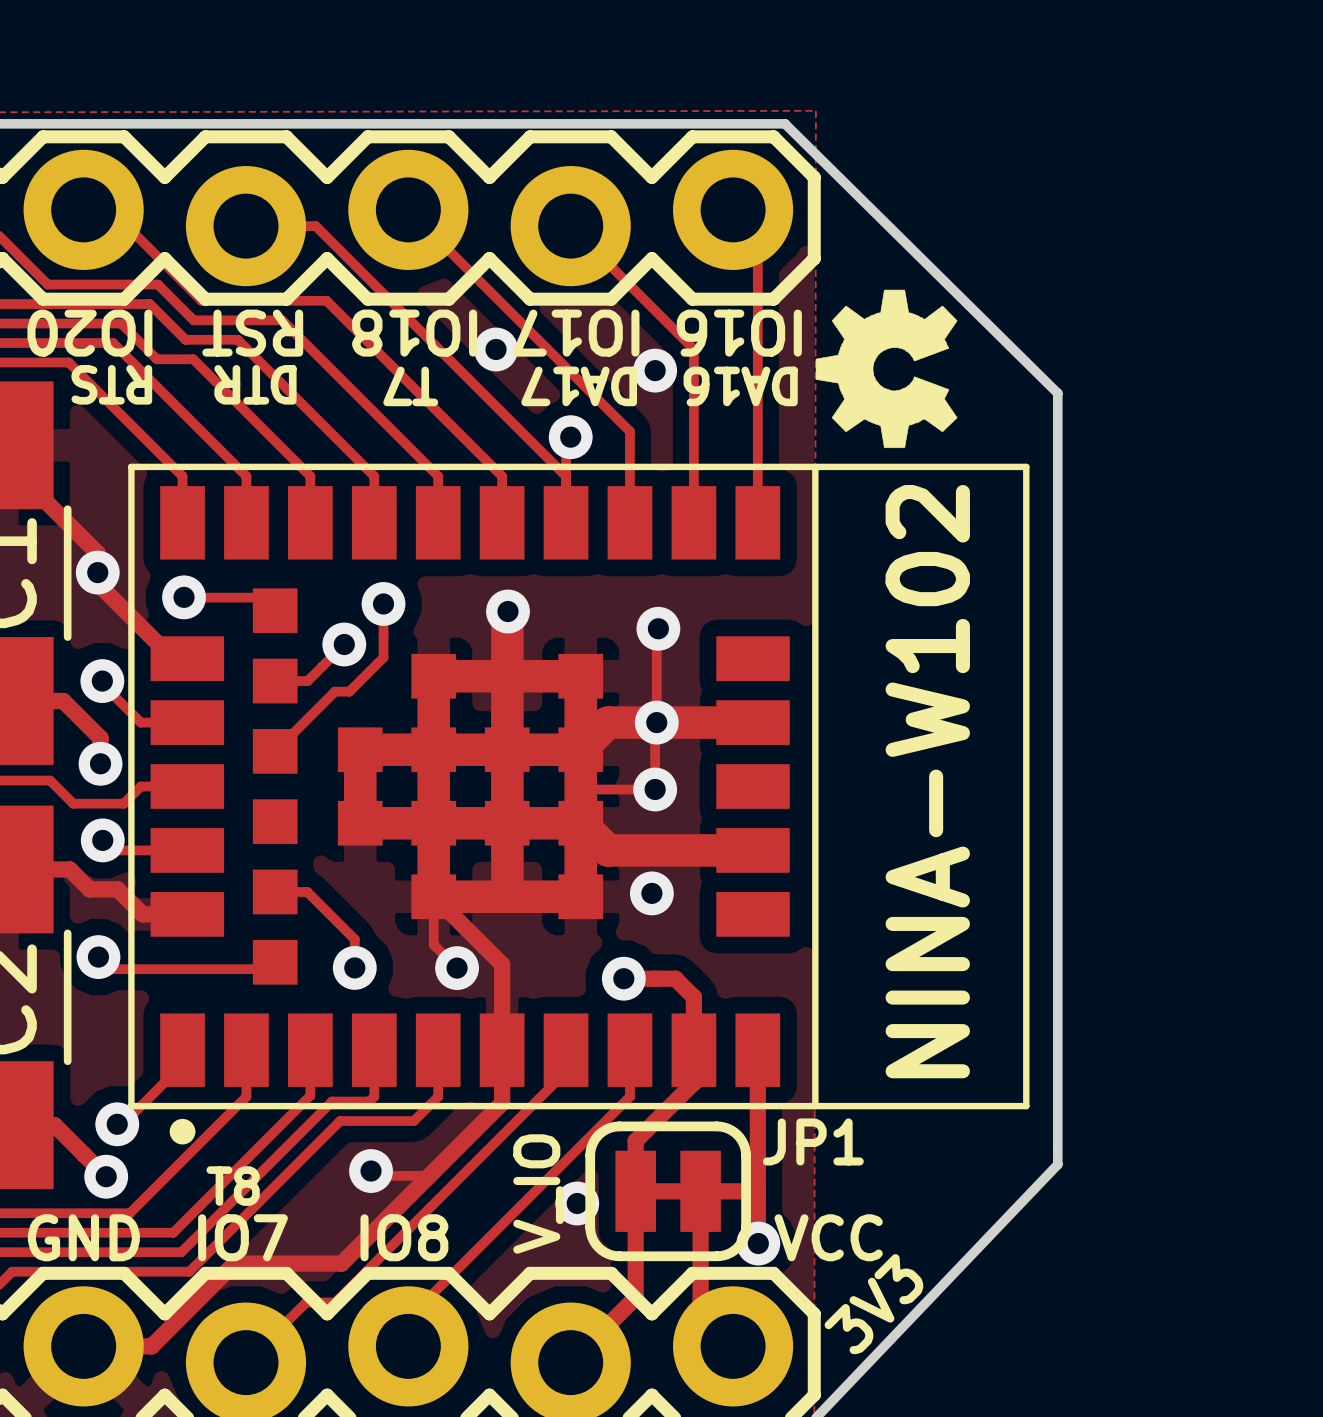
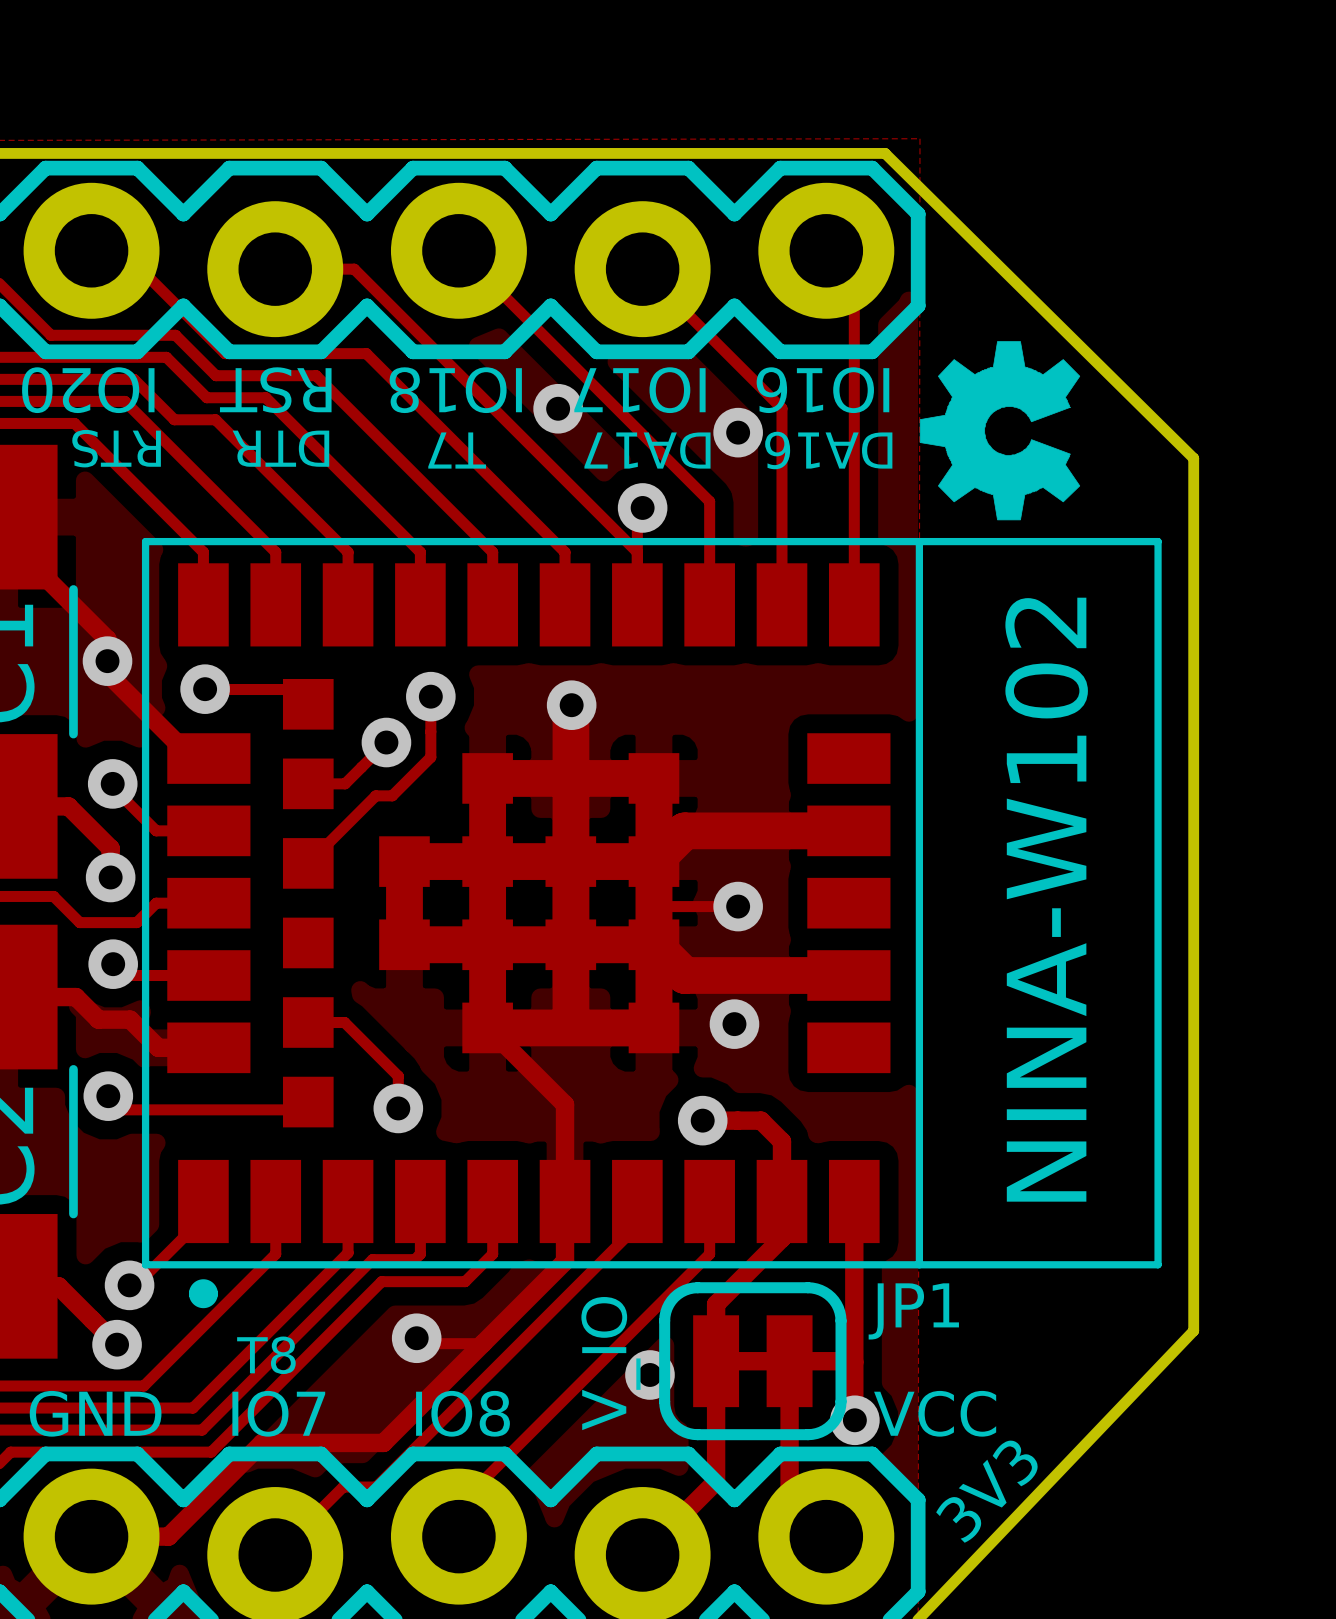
track: (658, 628) (656, 630) (655, 789) -> none
via: (658, 628) -> none
via: (656, 722) -> none
track: (433, 896) (433, 944) (457, 968) -> none
via: (457, 968) -> none

